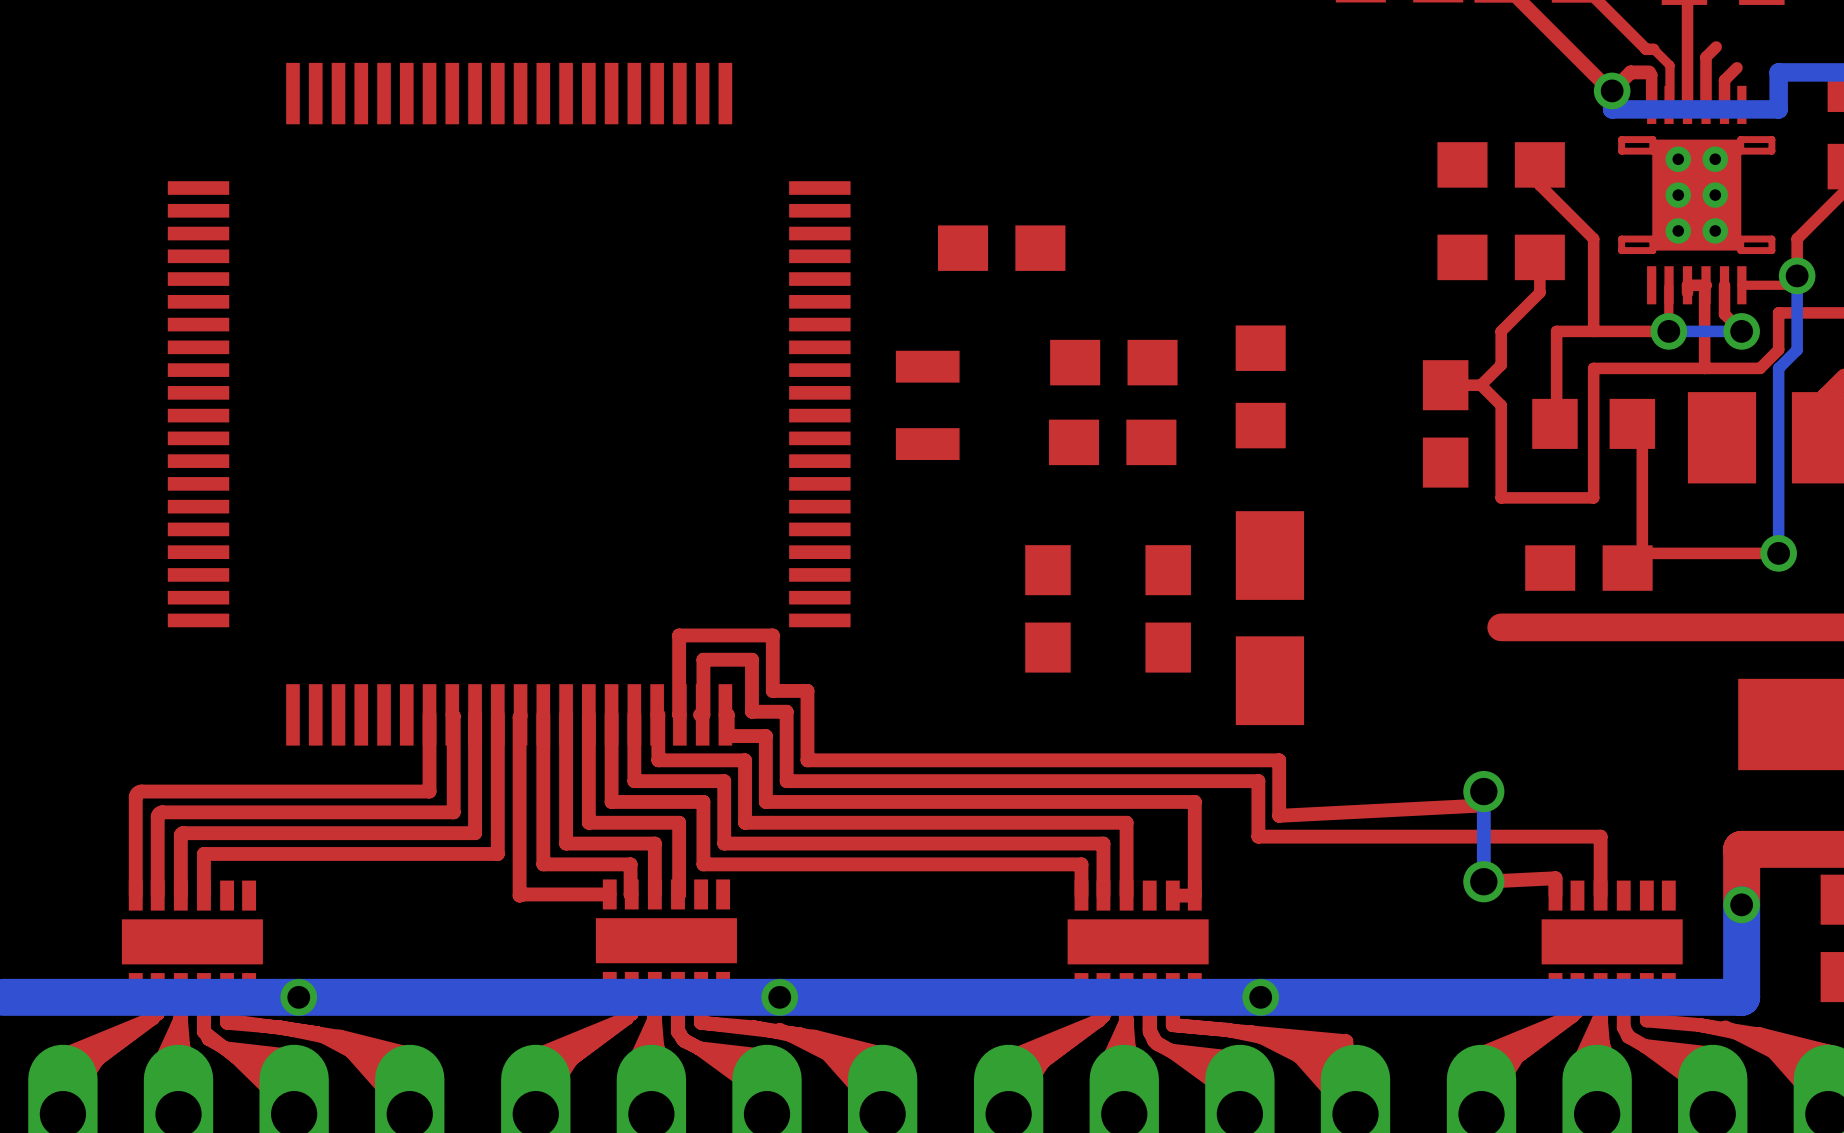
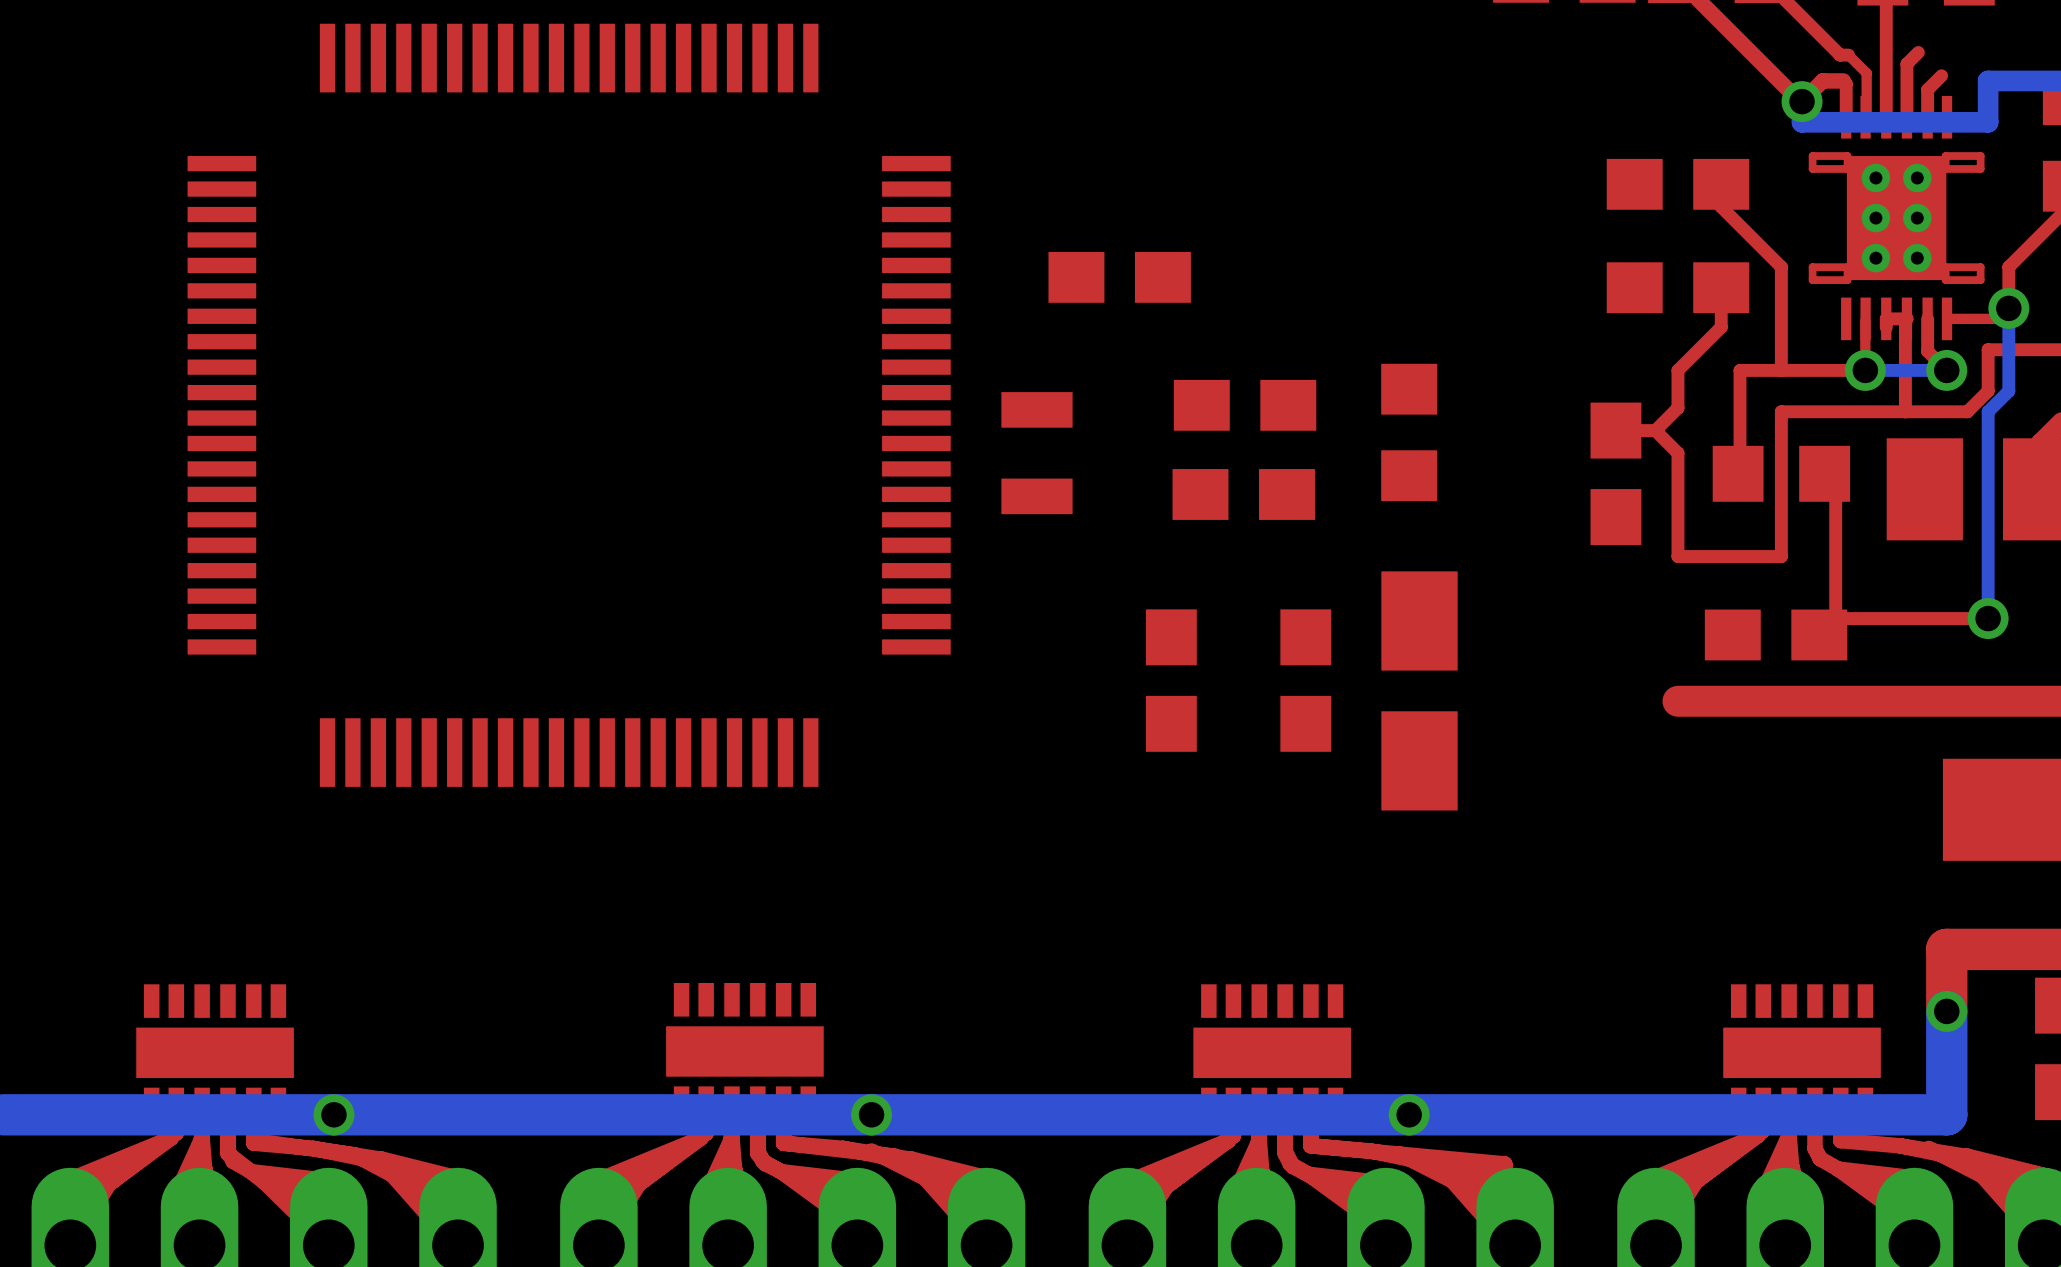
part position: (509, 404) -> (569, 405)
top track: (429, 714) (429, 791) (138, 792) (135, 797) (135, 895) -> none
top track: (452, 714) (453, 812) (161, 812) (157, 816) (157, 895) -> none
top track: (475, 714) (475, 833) (182, 833) (180, 835) (180, 895) -> none
top track: (497, 714) (497, 853) (203, 853) (203, 895) -> none
top track: (520, 714) (519, 895) (522, 893) (609, 894) -> none
top track: (543, 714) (543, 864) (630, 864) (631, 894) -> none
top track: (566, 714) (566, 843) (654, 843) (654, 894) -> none
top track: (588, 714) (588, 822) (679, 822) (677, 894) -> none
top track: (611, 714) (611, 801) (703, 801) (703, 864) (1081, 864) (1081, 895) -> none
top track: (634, 714) (634, 781) (724, 781) (724, 843) (1103, 843) (1103, 895) -> none
top track: (657, 714) (658, 760) (745, 760) (745, 822) (1126, 822) (1126, 895) -> none
top track: (679, 714) (679, 635) (772, 635) (772, 690) (807, 690) (807, 760) (1279, 760) (1279, 815) (1483, 805) (1483, 791) -> none
top track: (699, 714) (703, 714) (703, 659) (751, 659) (751, 711) (786, 711) (786, 781) (1258, 781) (1258, 836) (1600, 836) (1600, 895) -> none
top track: (725, 714) (727, 714) (727, 736) (765, 736) (765, 801) (1194, 801) (1194, 895) (1172, 895) -> none
bottom track: (1483, 791) (1483, 881) -> none
via: (1483, 791) -> none
top track: (1483, 881) (1555, 878) (1555, 895) -> none
via: (1483, 881) -> none

